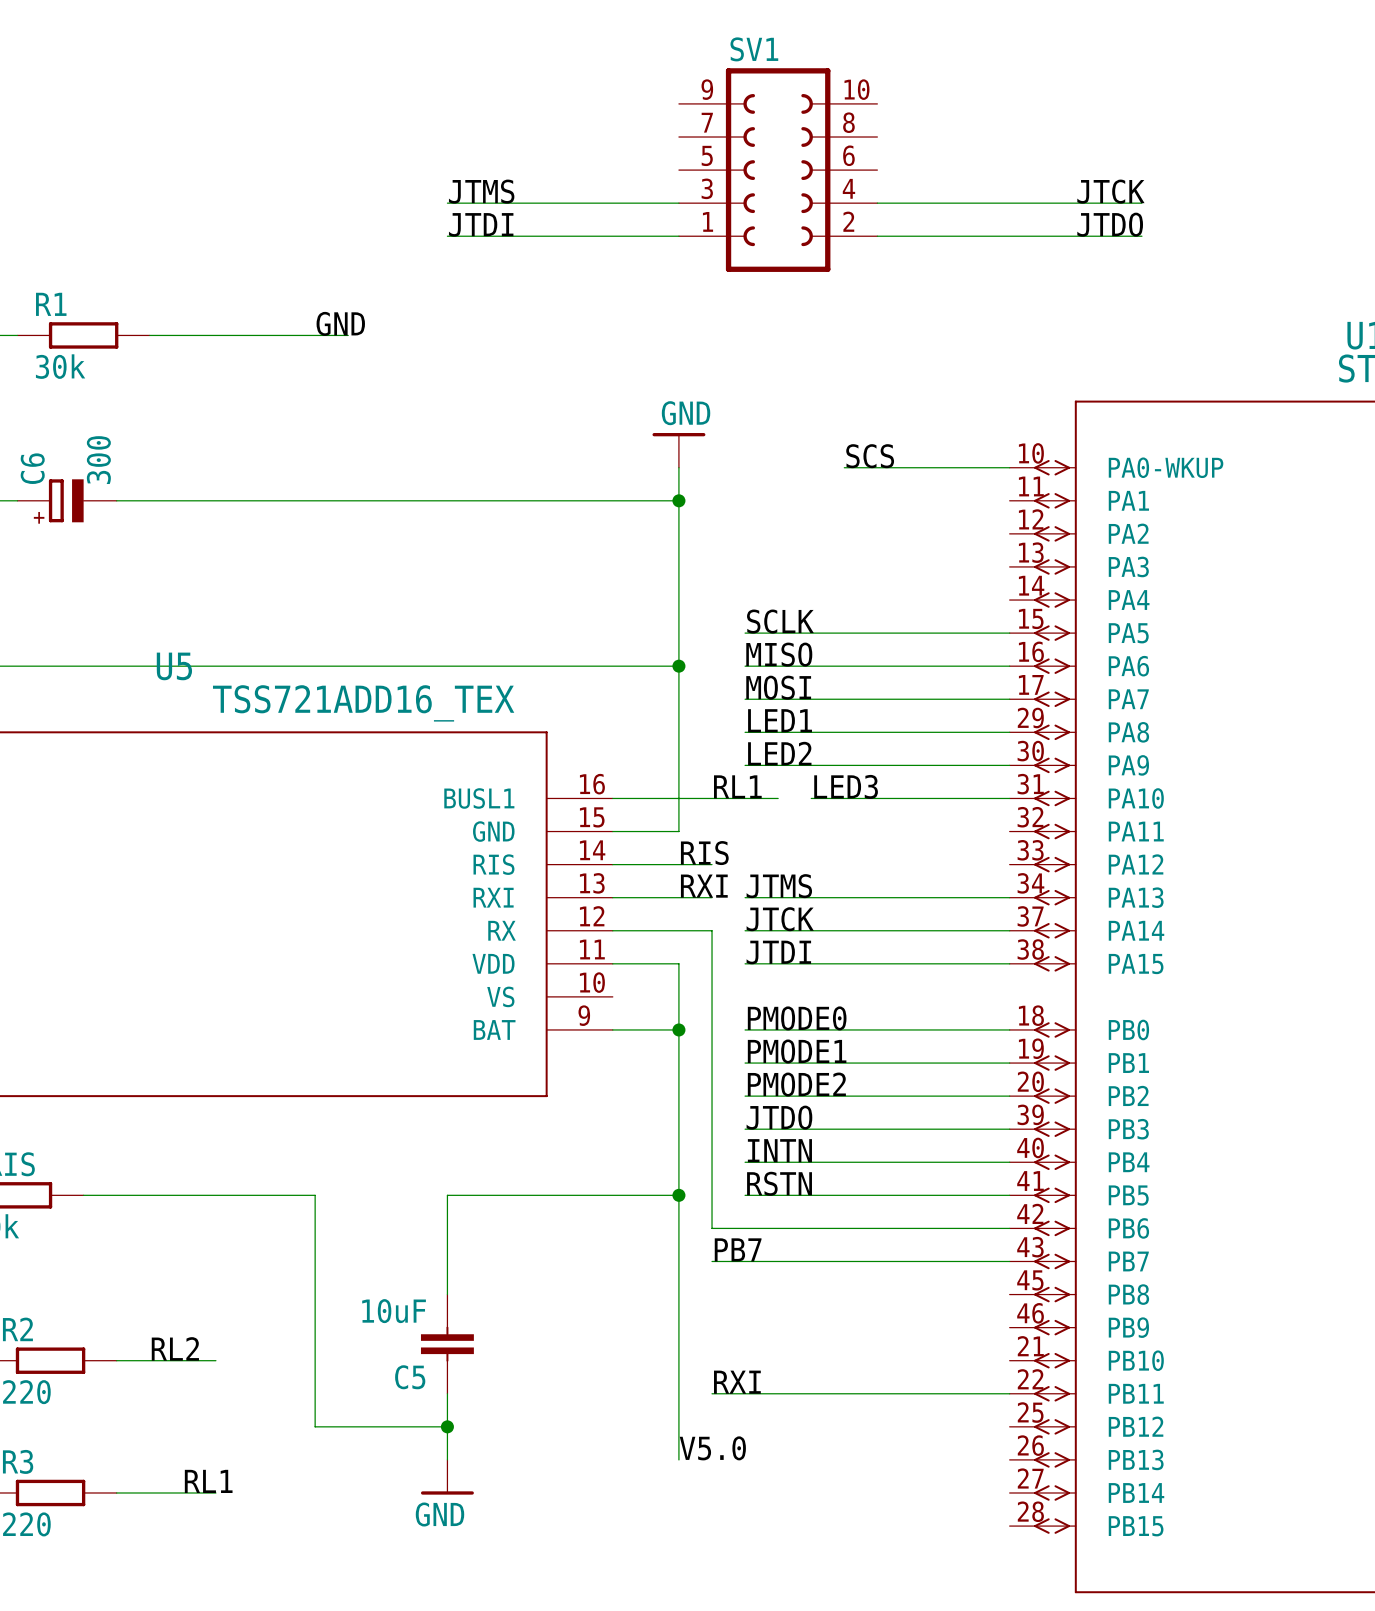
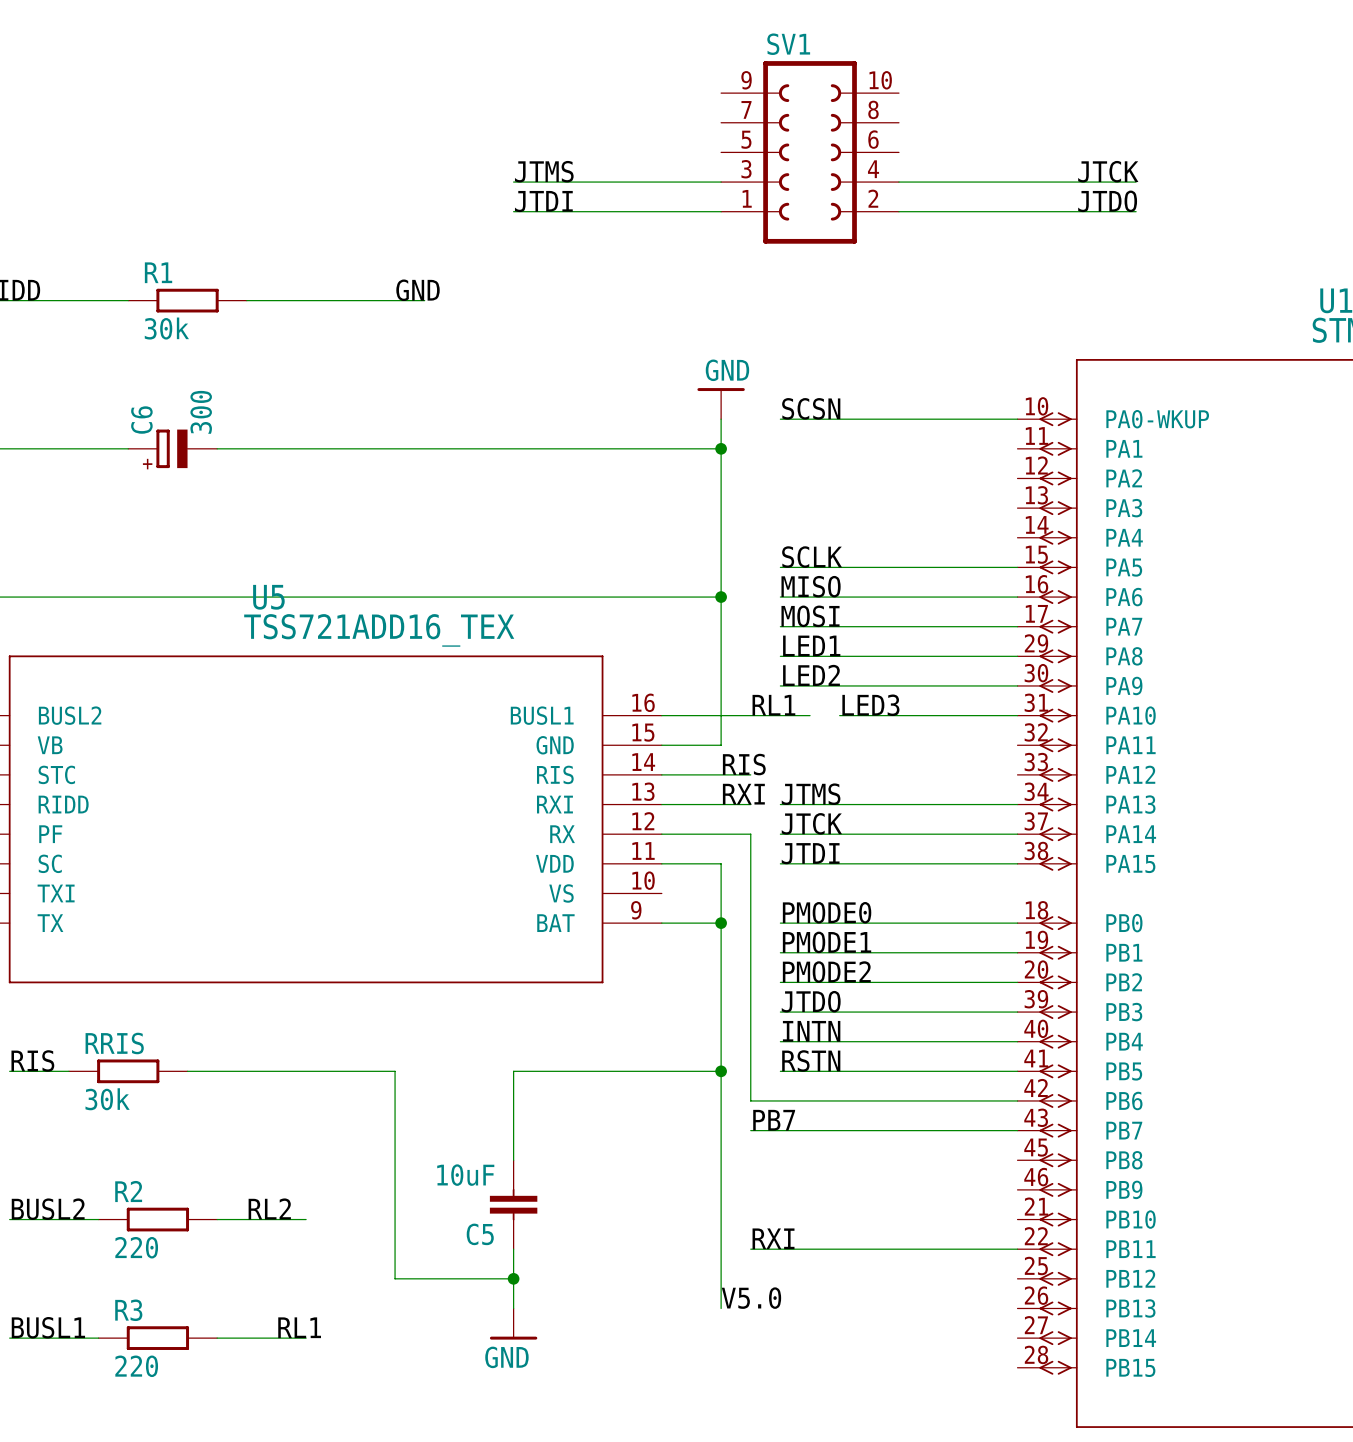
label: none -> SCSN (811, 408)
label: SCS (870, 456) -> none
wire: none -> (780, 419) (869, 419)
U5 value position: TSS721ADD16_TEX (363, 703) -> TSS721ADD16_TEX (379, 630)

